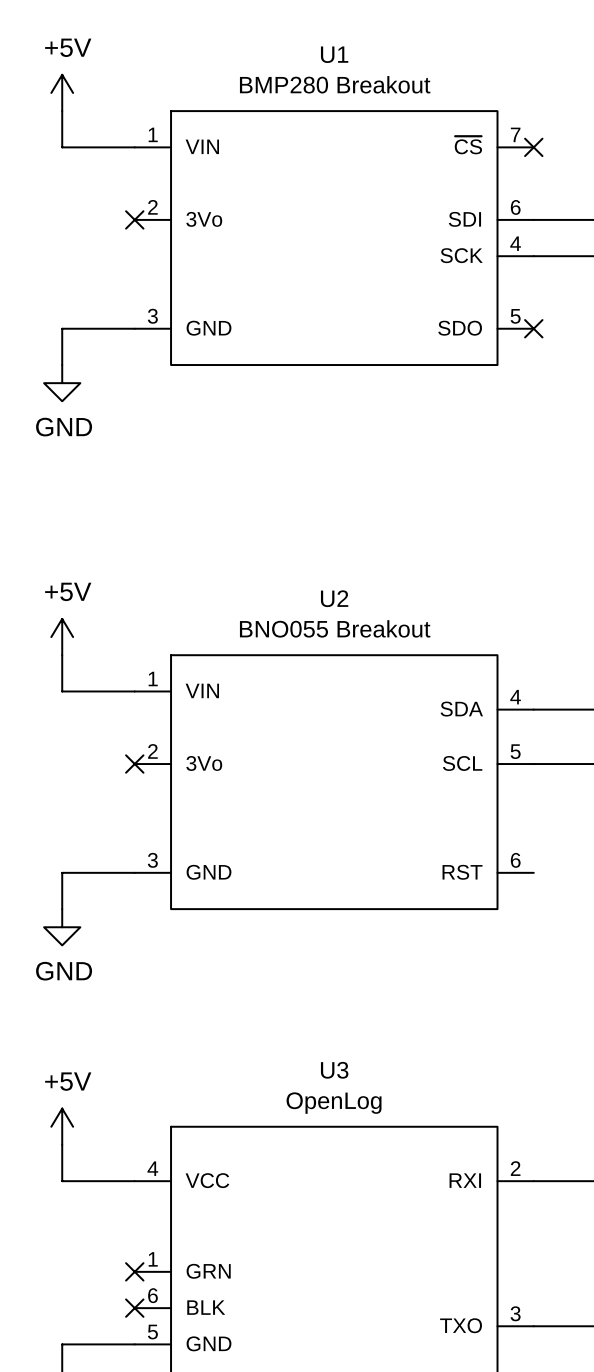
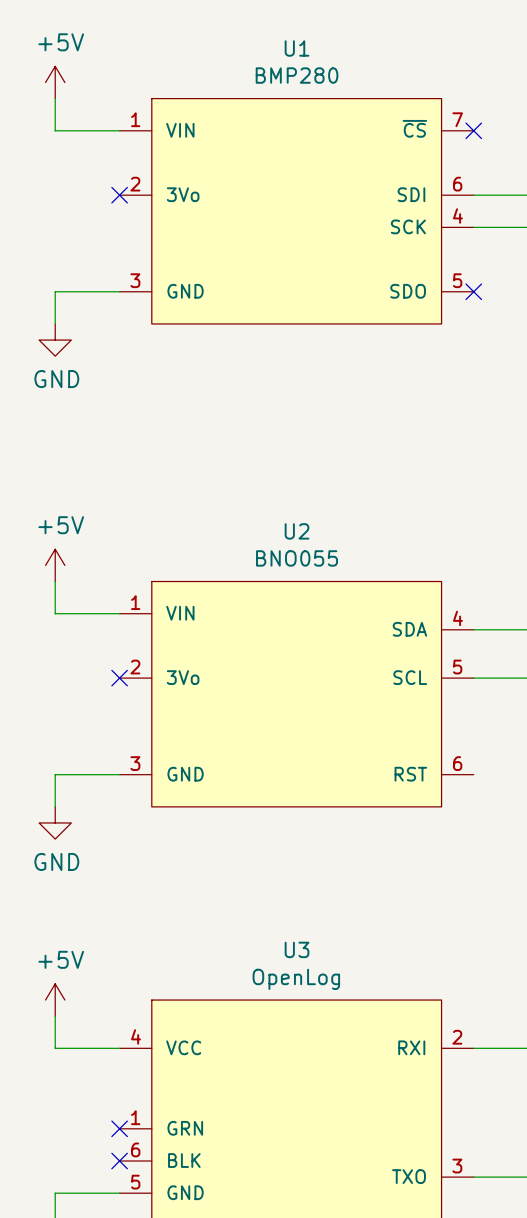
U1 value: BMP280 Breakout (335, 84) -> BMP280 (297, 75)
U2 value: BNO055 Breakout (335, 628) -> BNO055 (297, 558)

